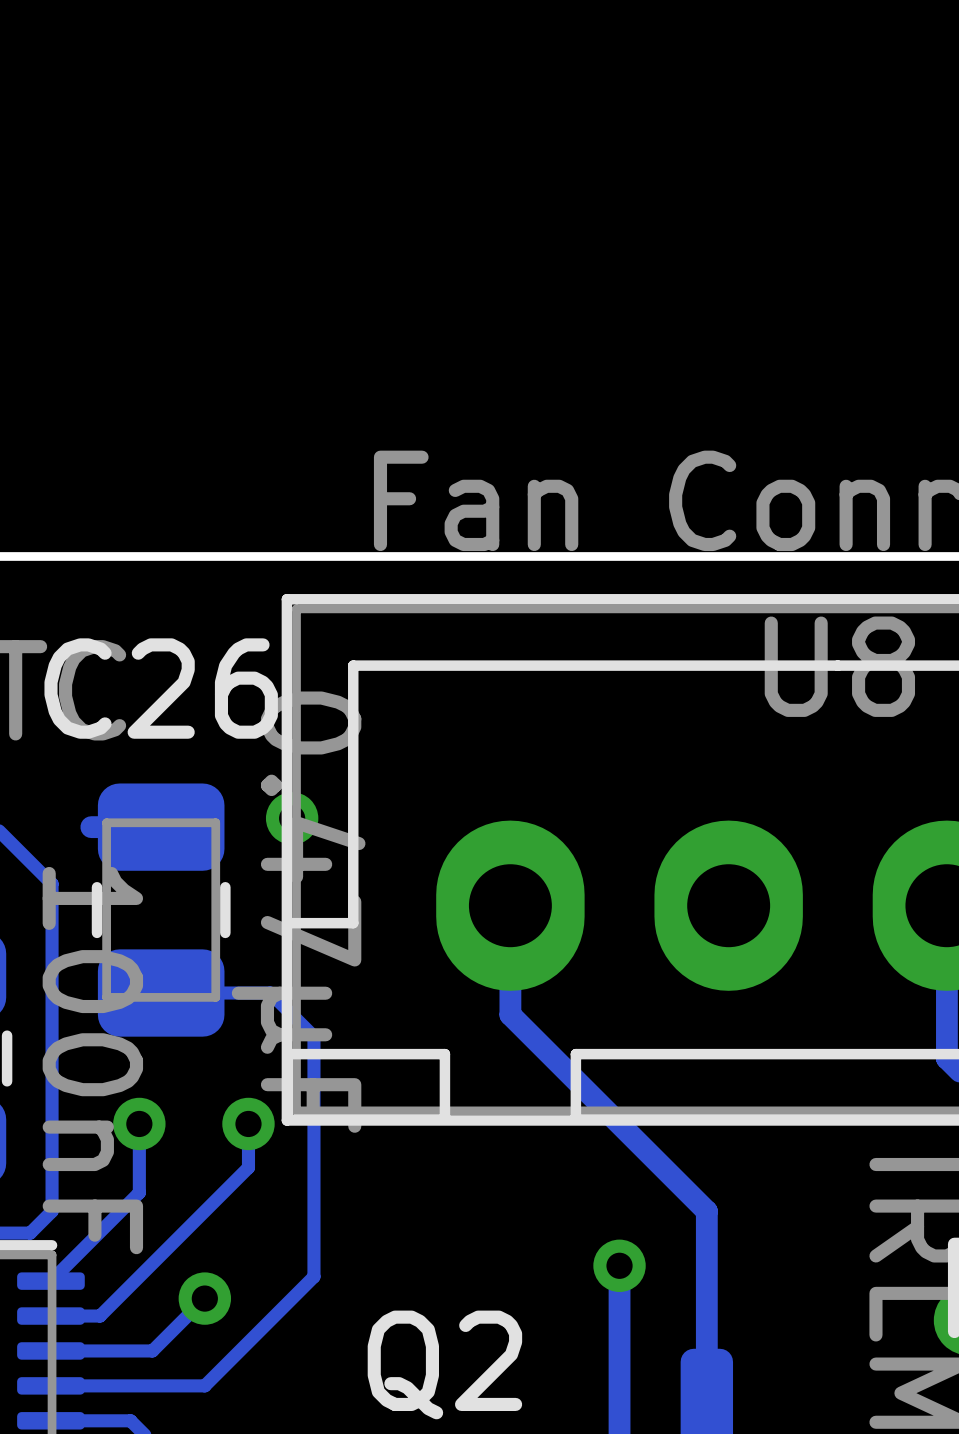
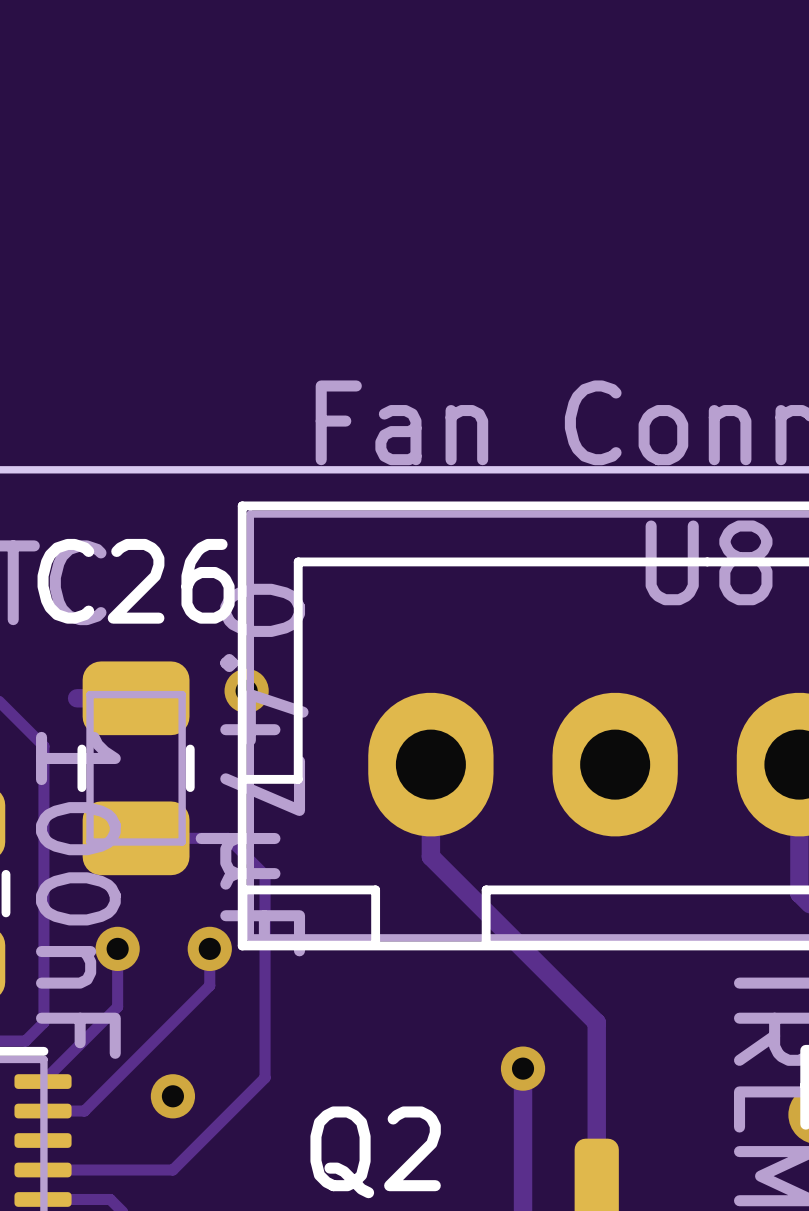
track: (204, 1298) (152, 1350) (50, 1350) -> none

